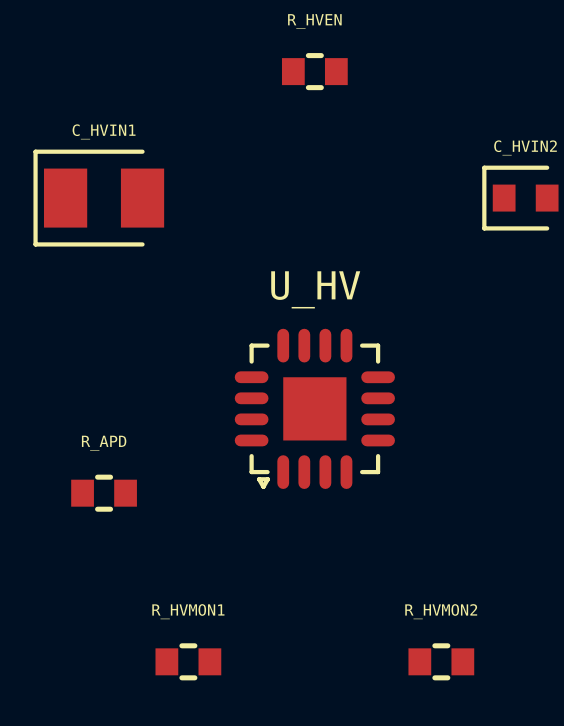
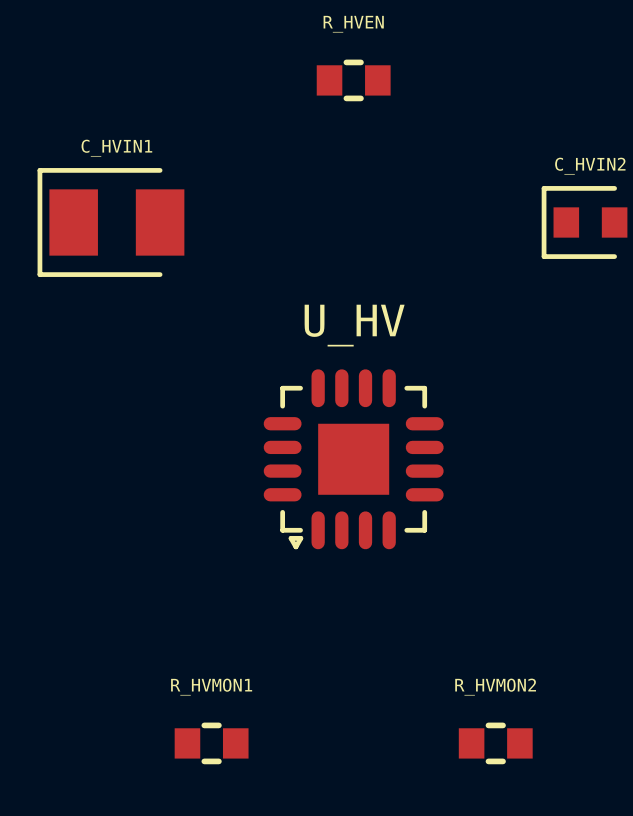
R_APD: (104, 493) -> none

